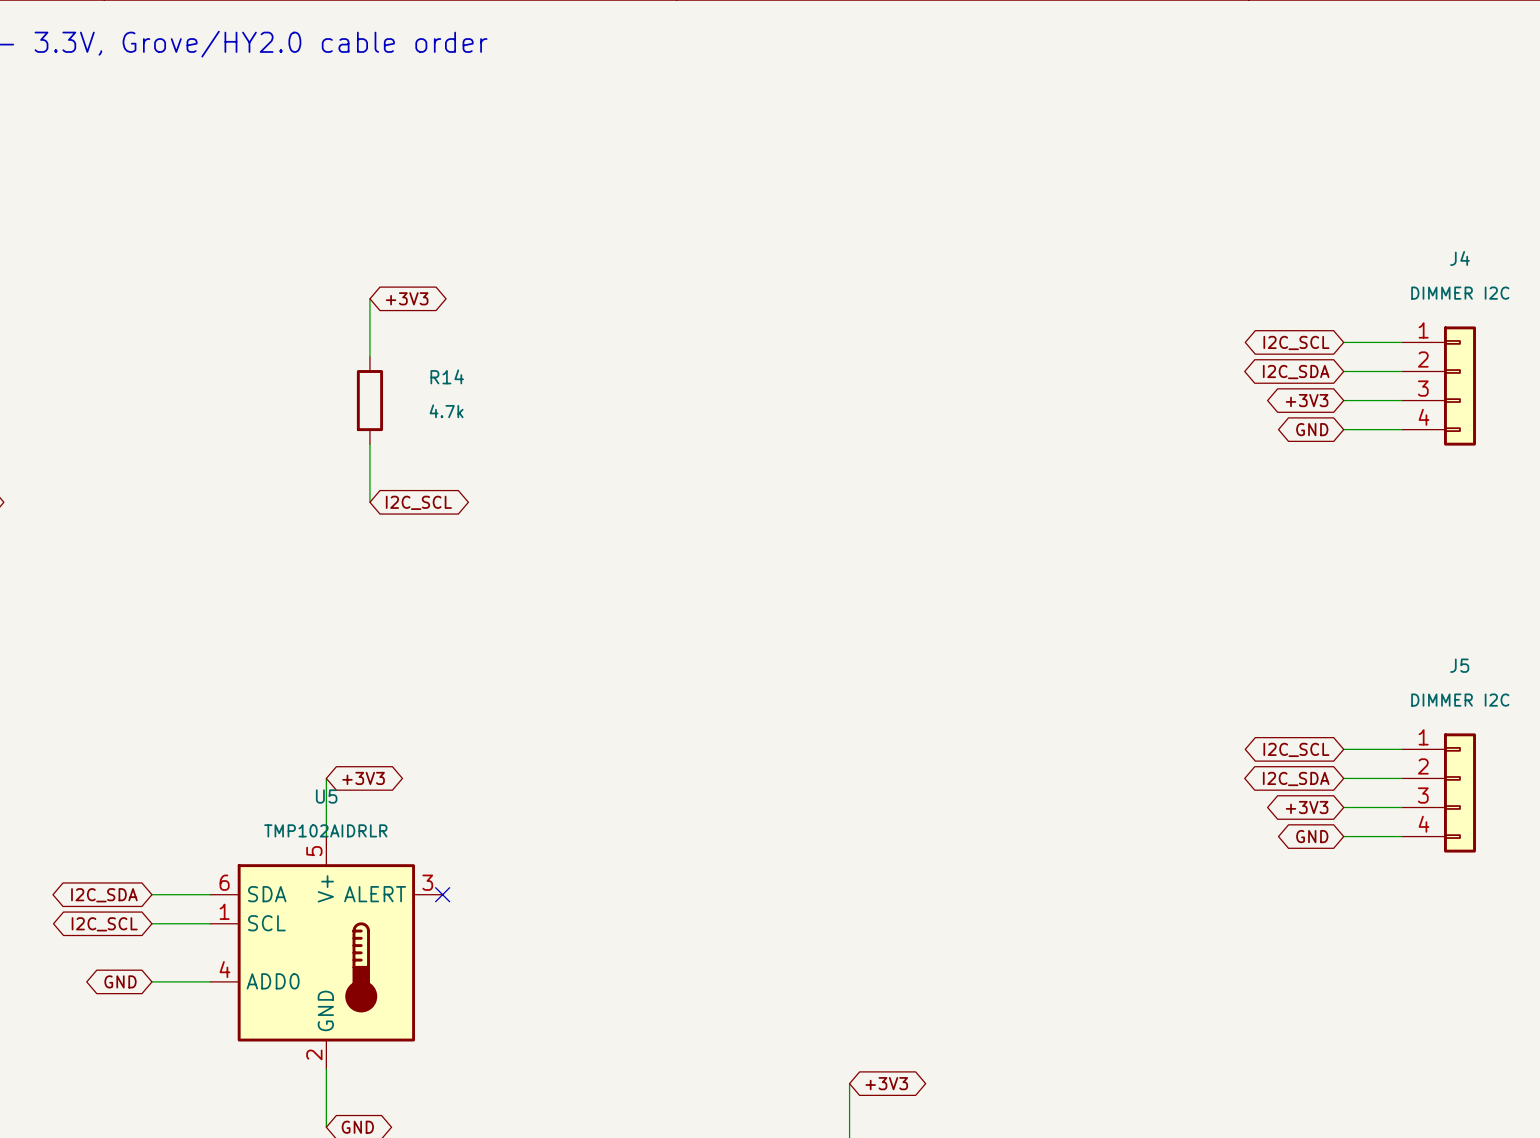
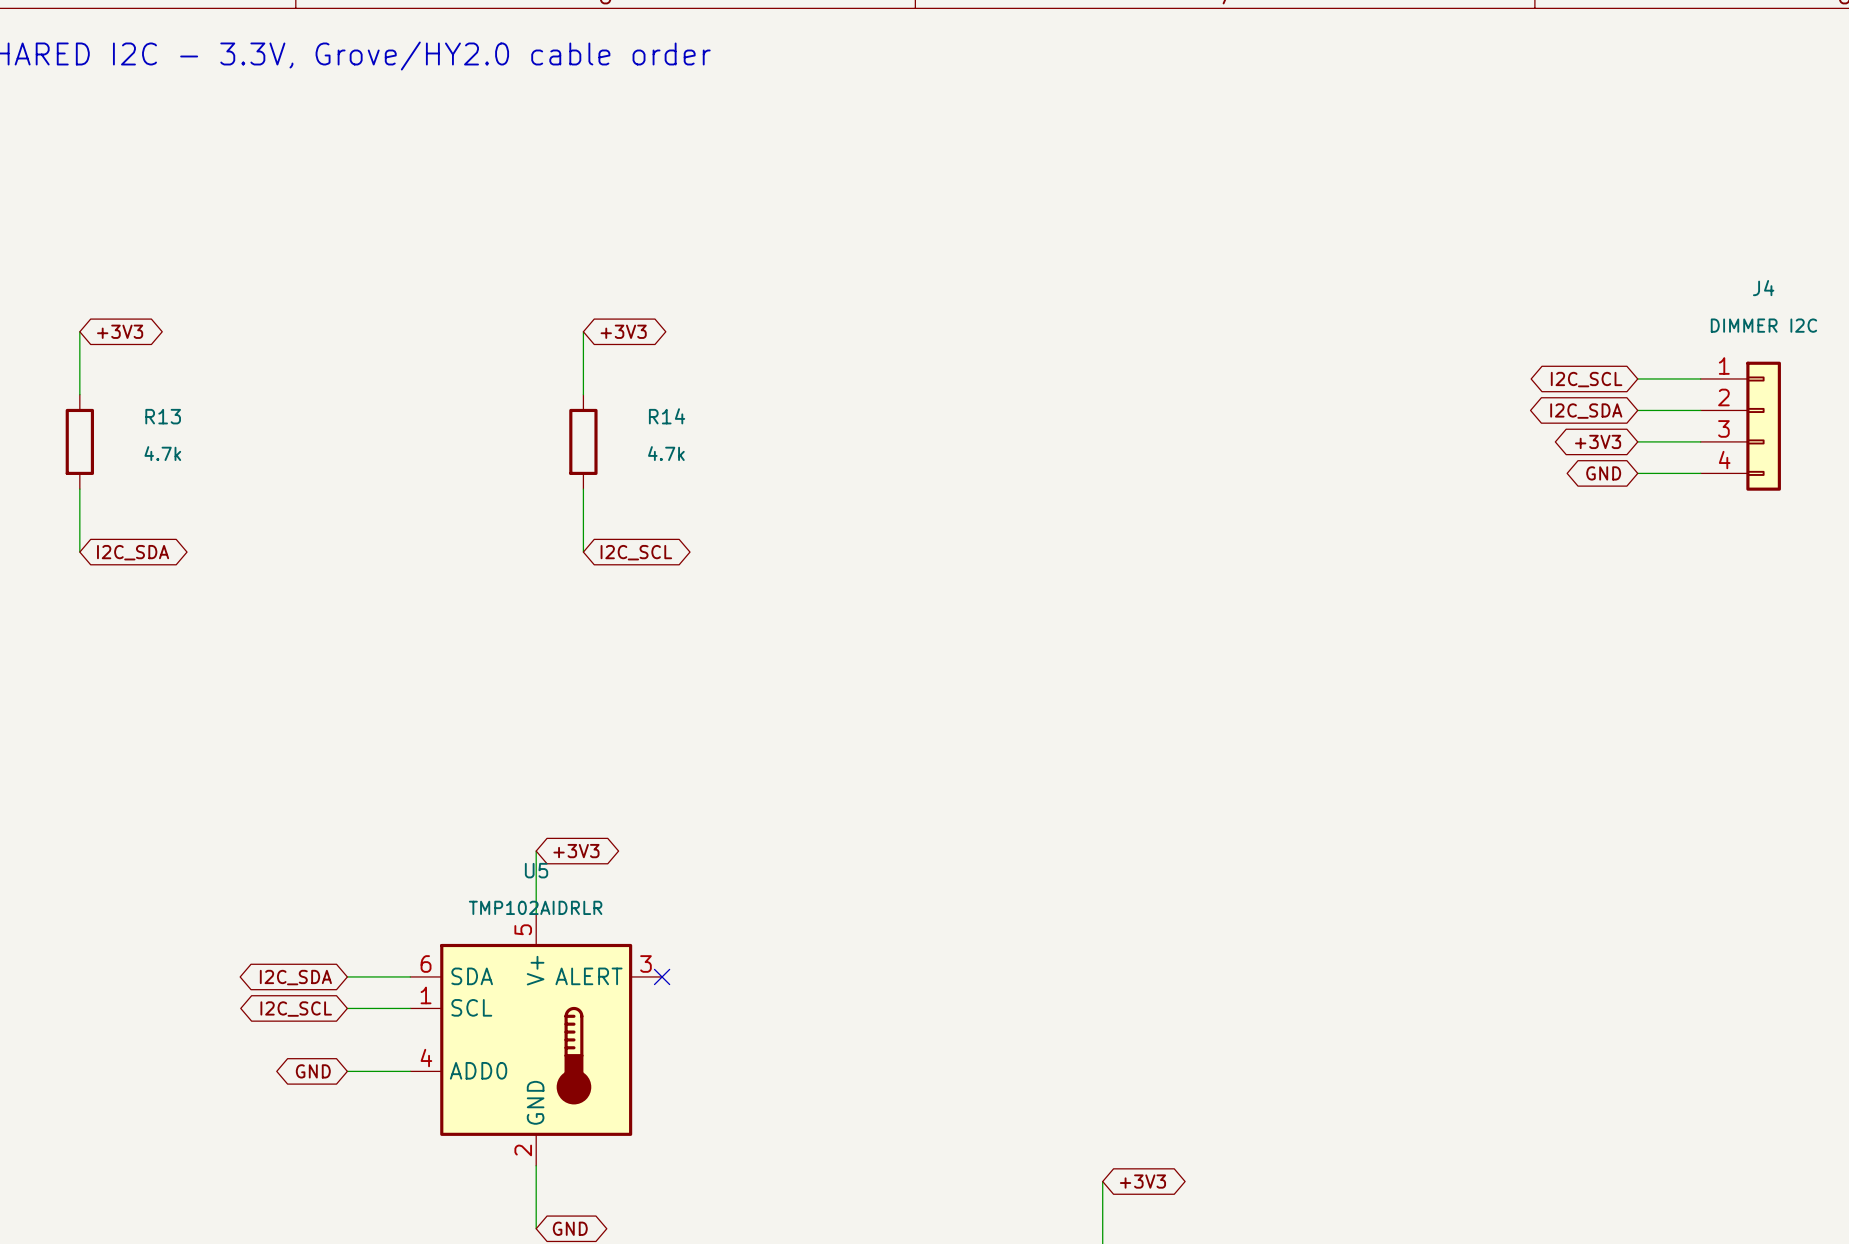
global label: I2C_SCL (1296, 749) -> none
wire: (1343, 749) (1401, 749) -> none
global label: I2C_SDA (1296, 778) -> none
wire: (1343, 778) (1401, 778) -> none
J5: DIMMER I2C (1438, 792) -> none
global label: +3V3 (1307, 807) -> none
wire: (1343, 807) (1401, 807) -> none
global label: GND (1312, 836) -> none
wire: (1343, 836) (1401, 836) -> none

